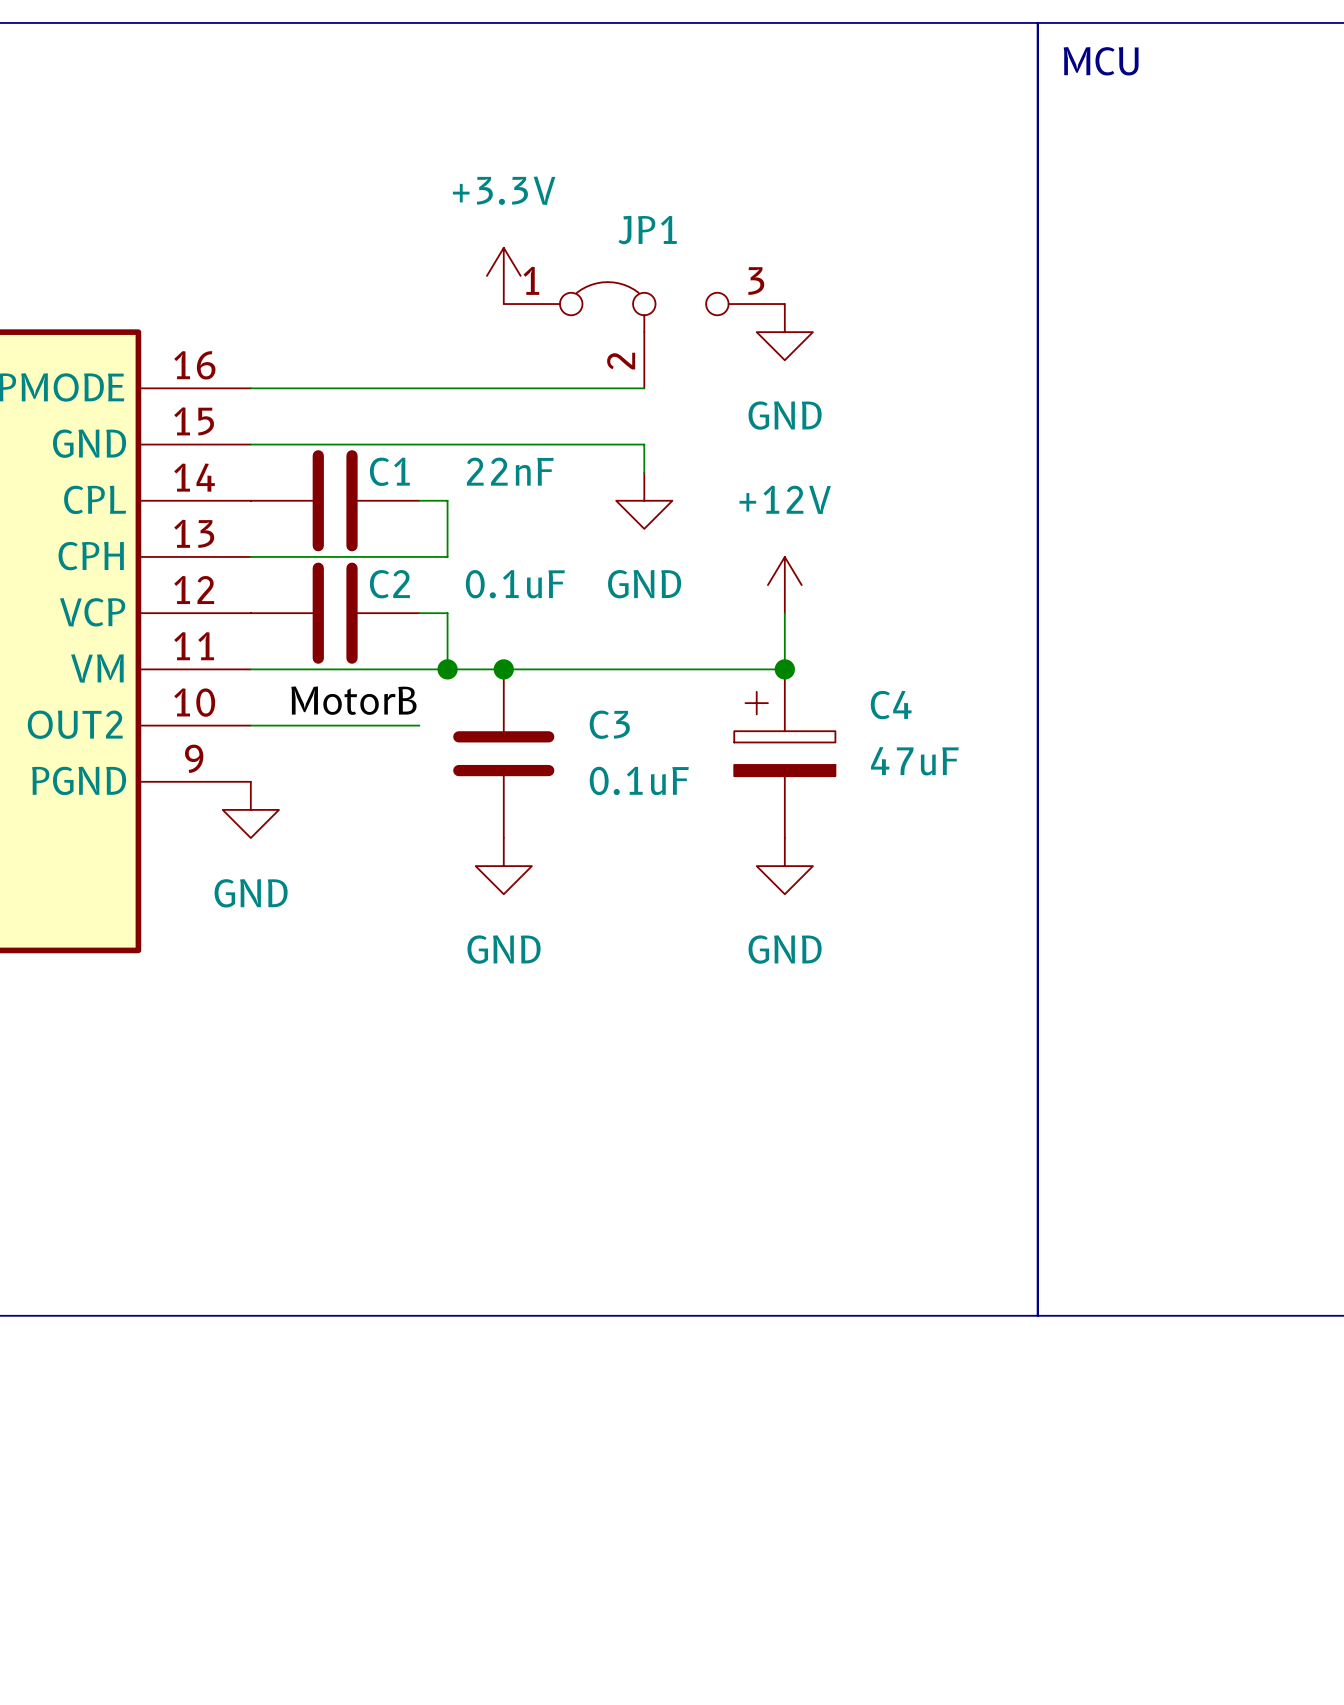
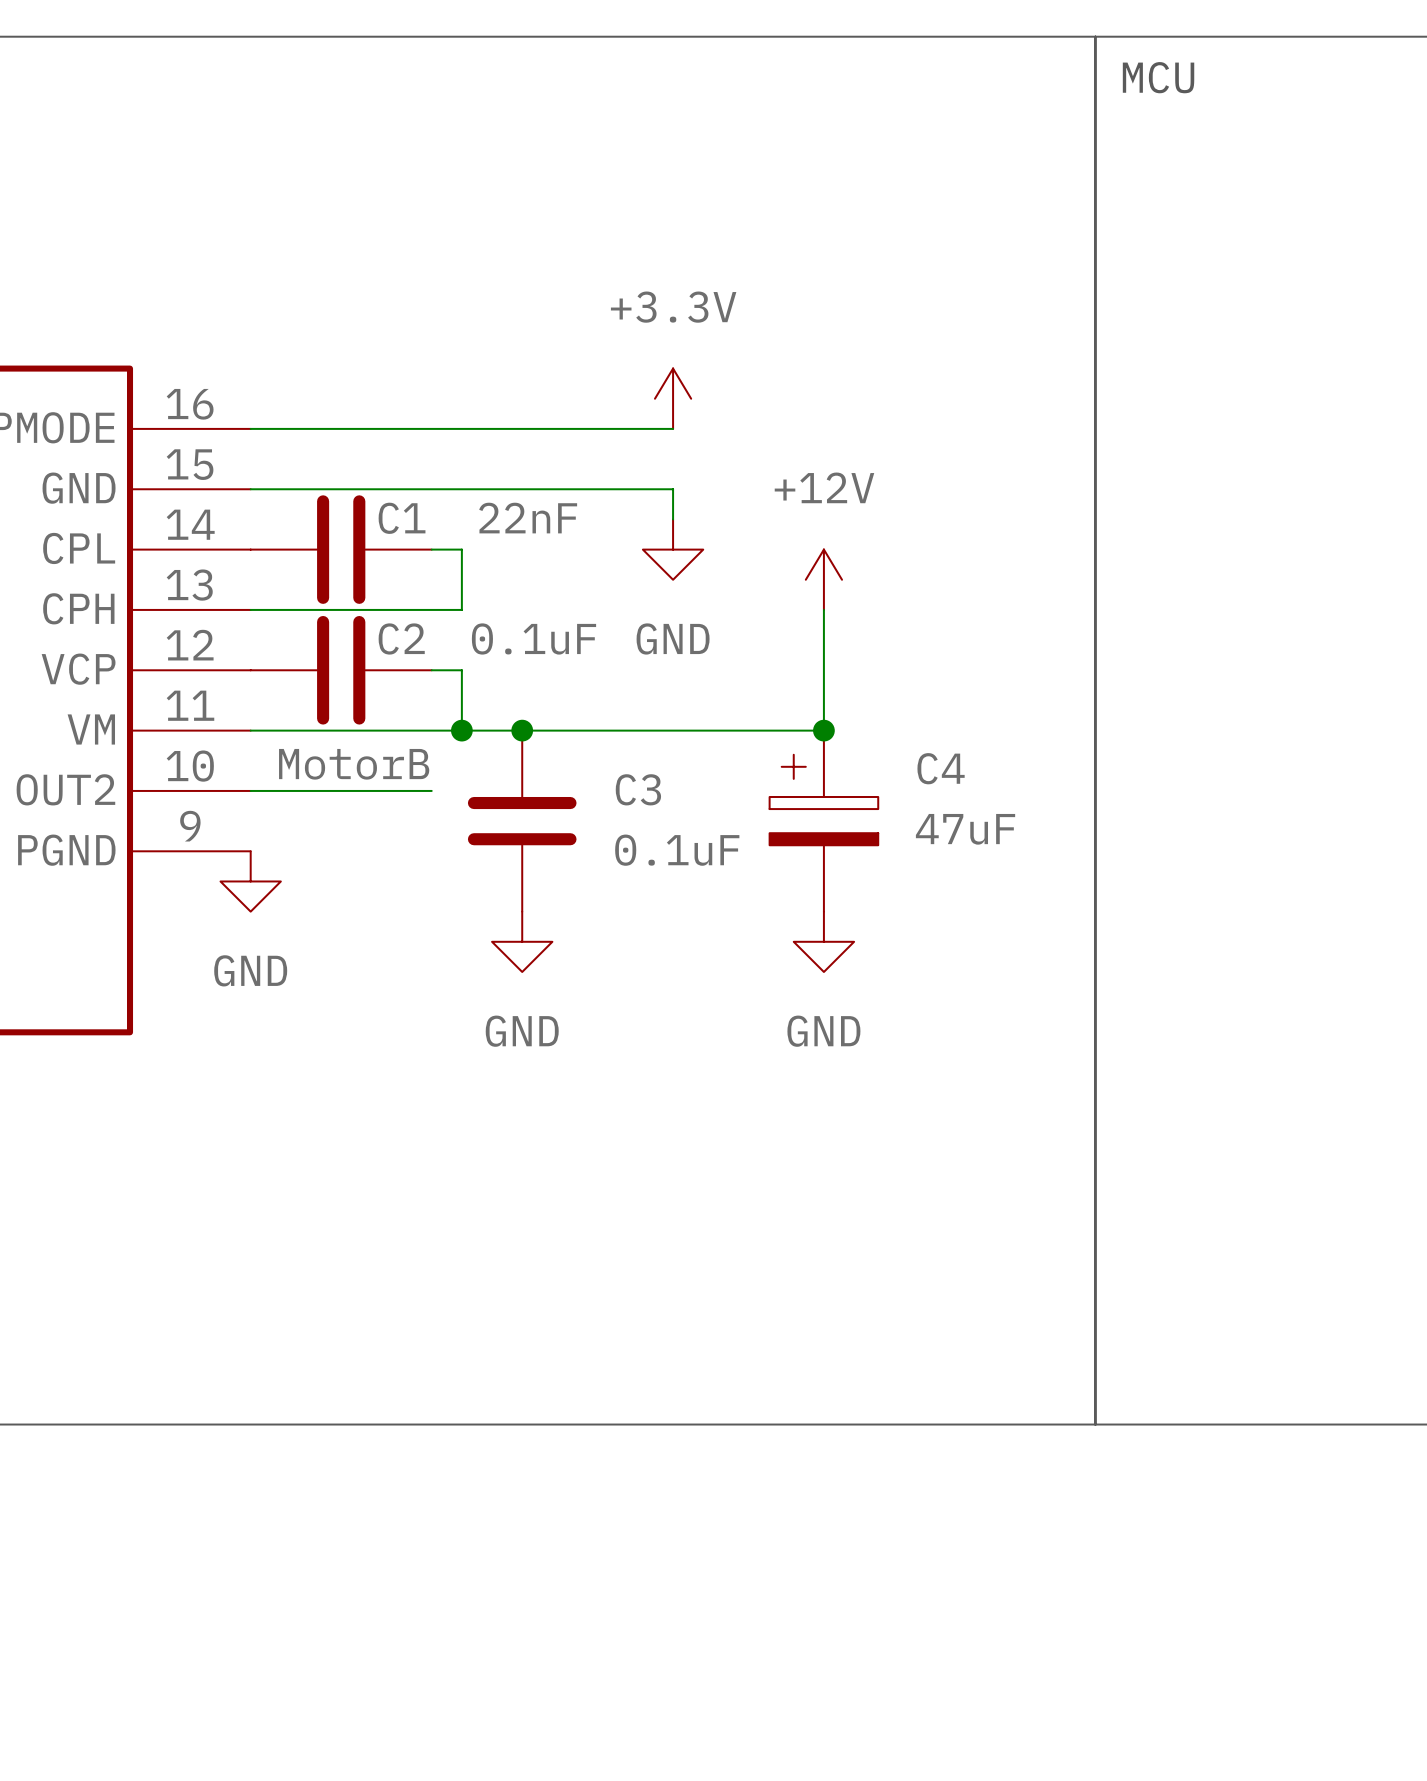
power symbol position: +3.3V (503, 275) -> +3.3V (673, 398)
power symbol: GND (784, 332) -> none
JP1: (644, 335) -> none
power symbol position: +12V (784, 585) -> +12V (823, 579)

